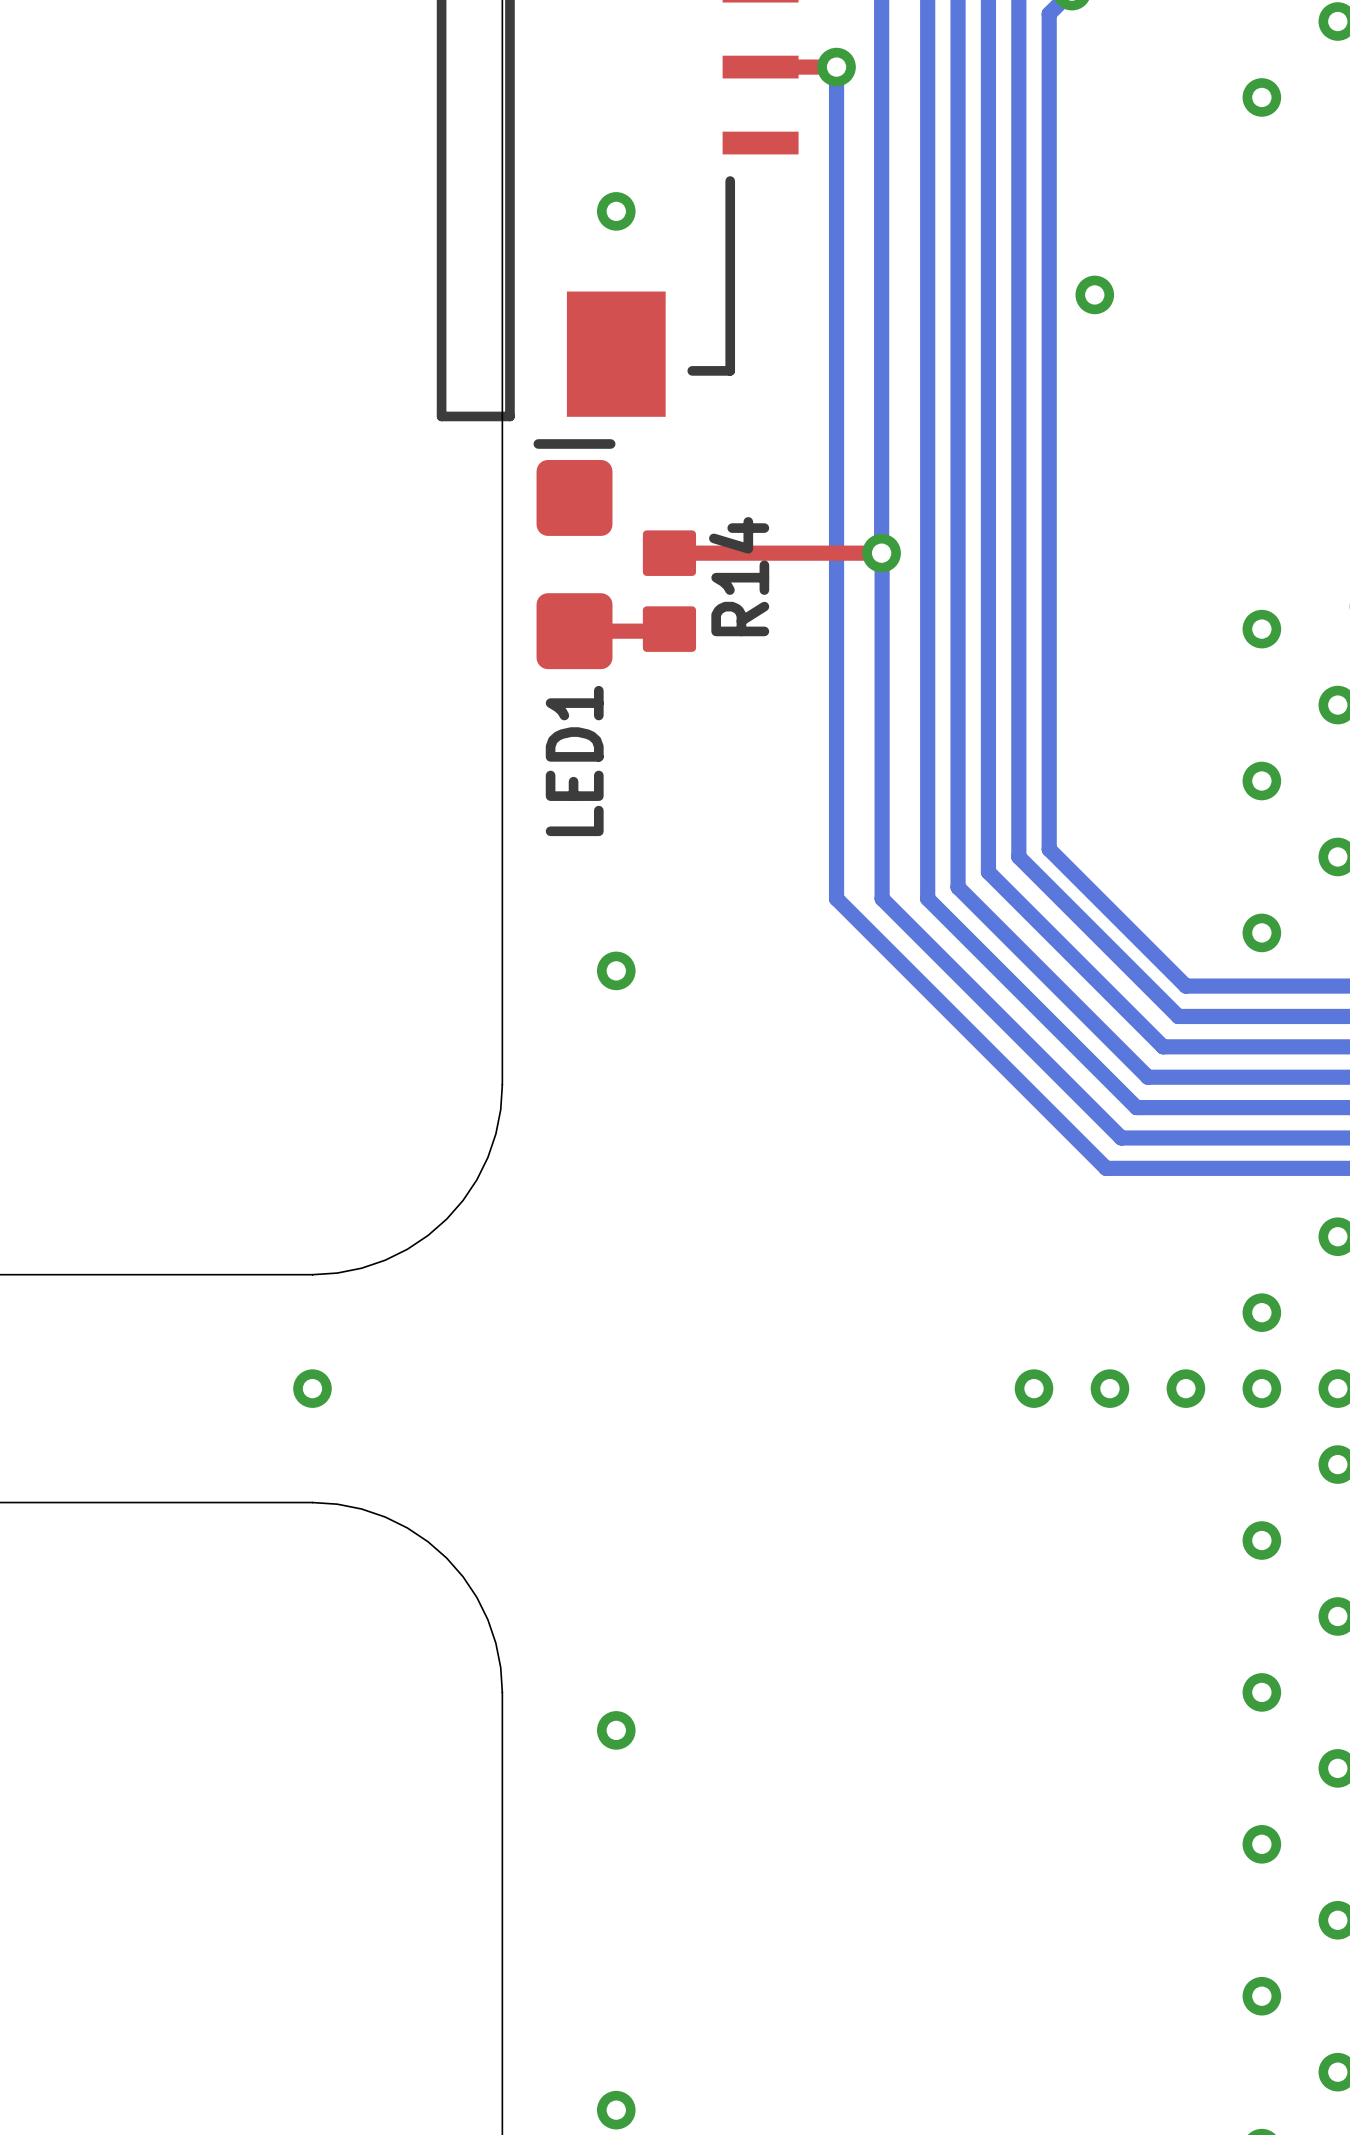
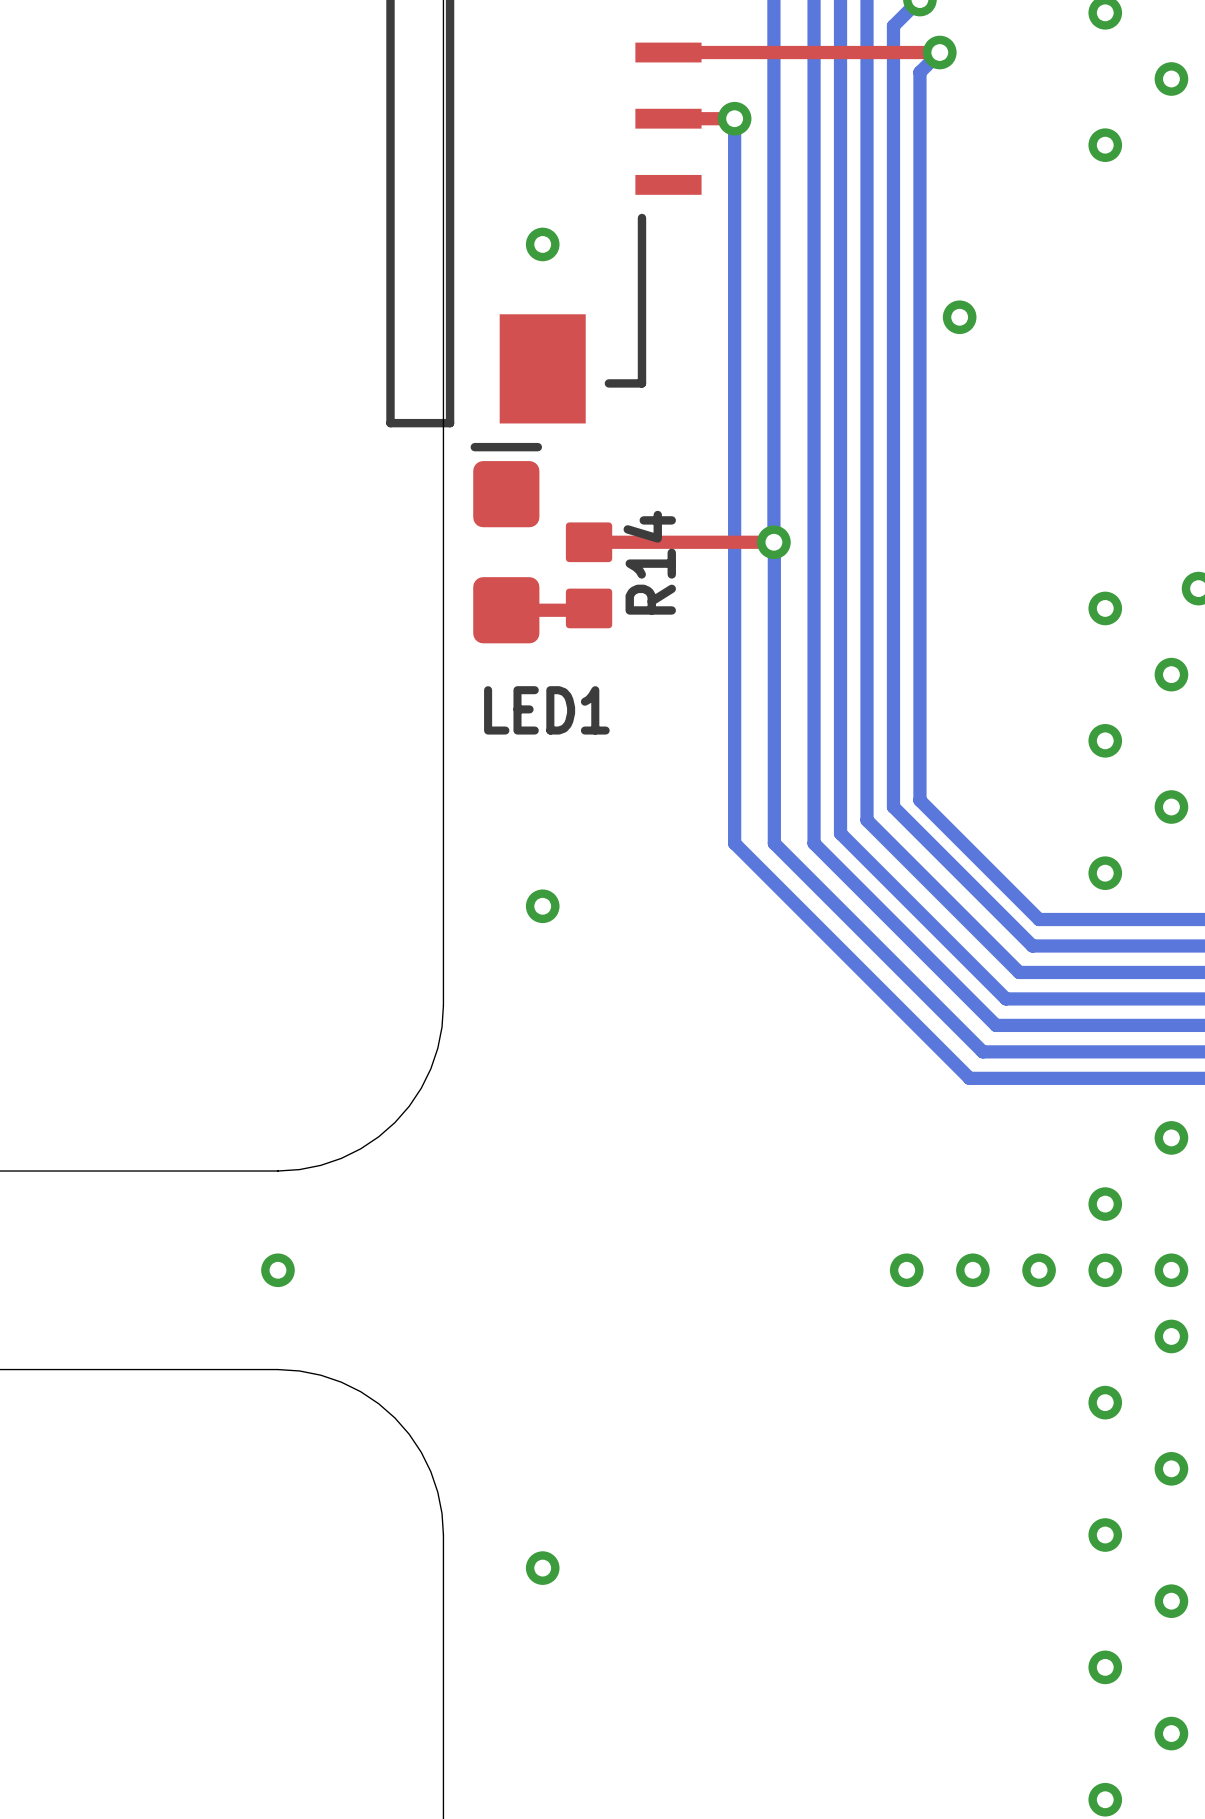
LED1 name rotation: 0° (574, 760) -> 90° clockwise (546, 710)

